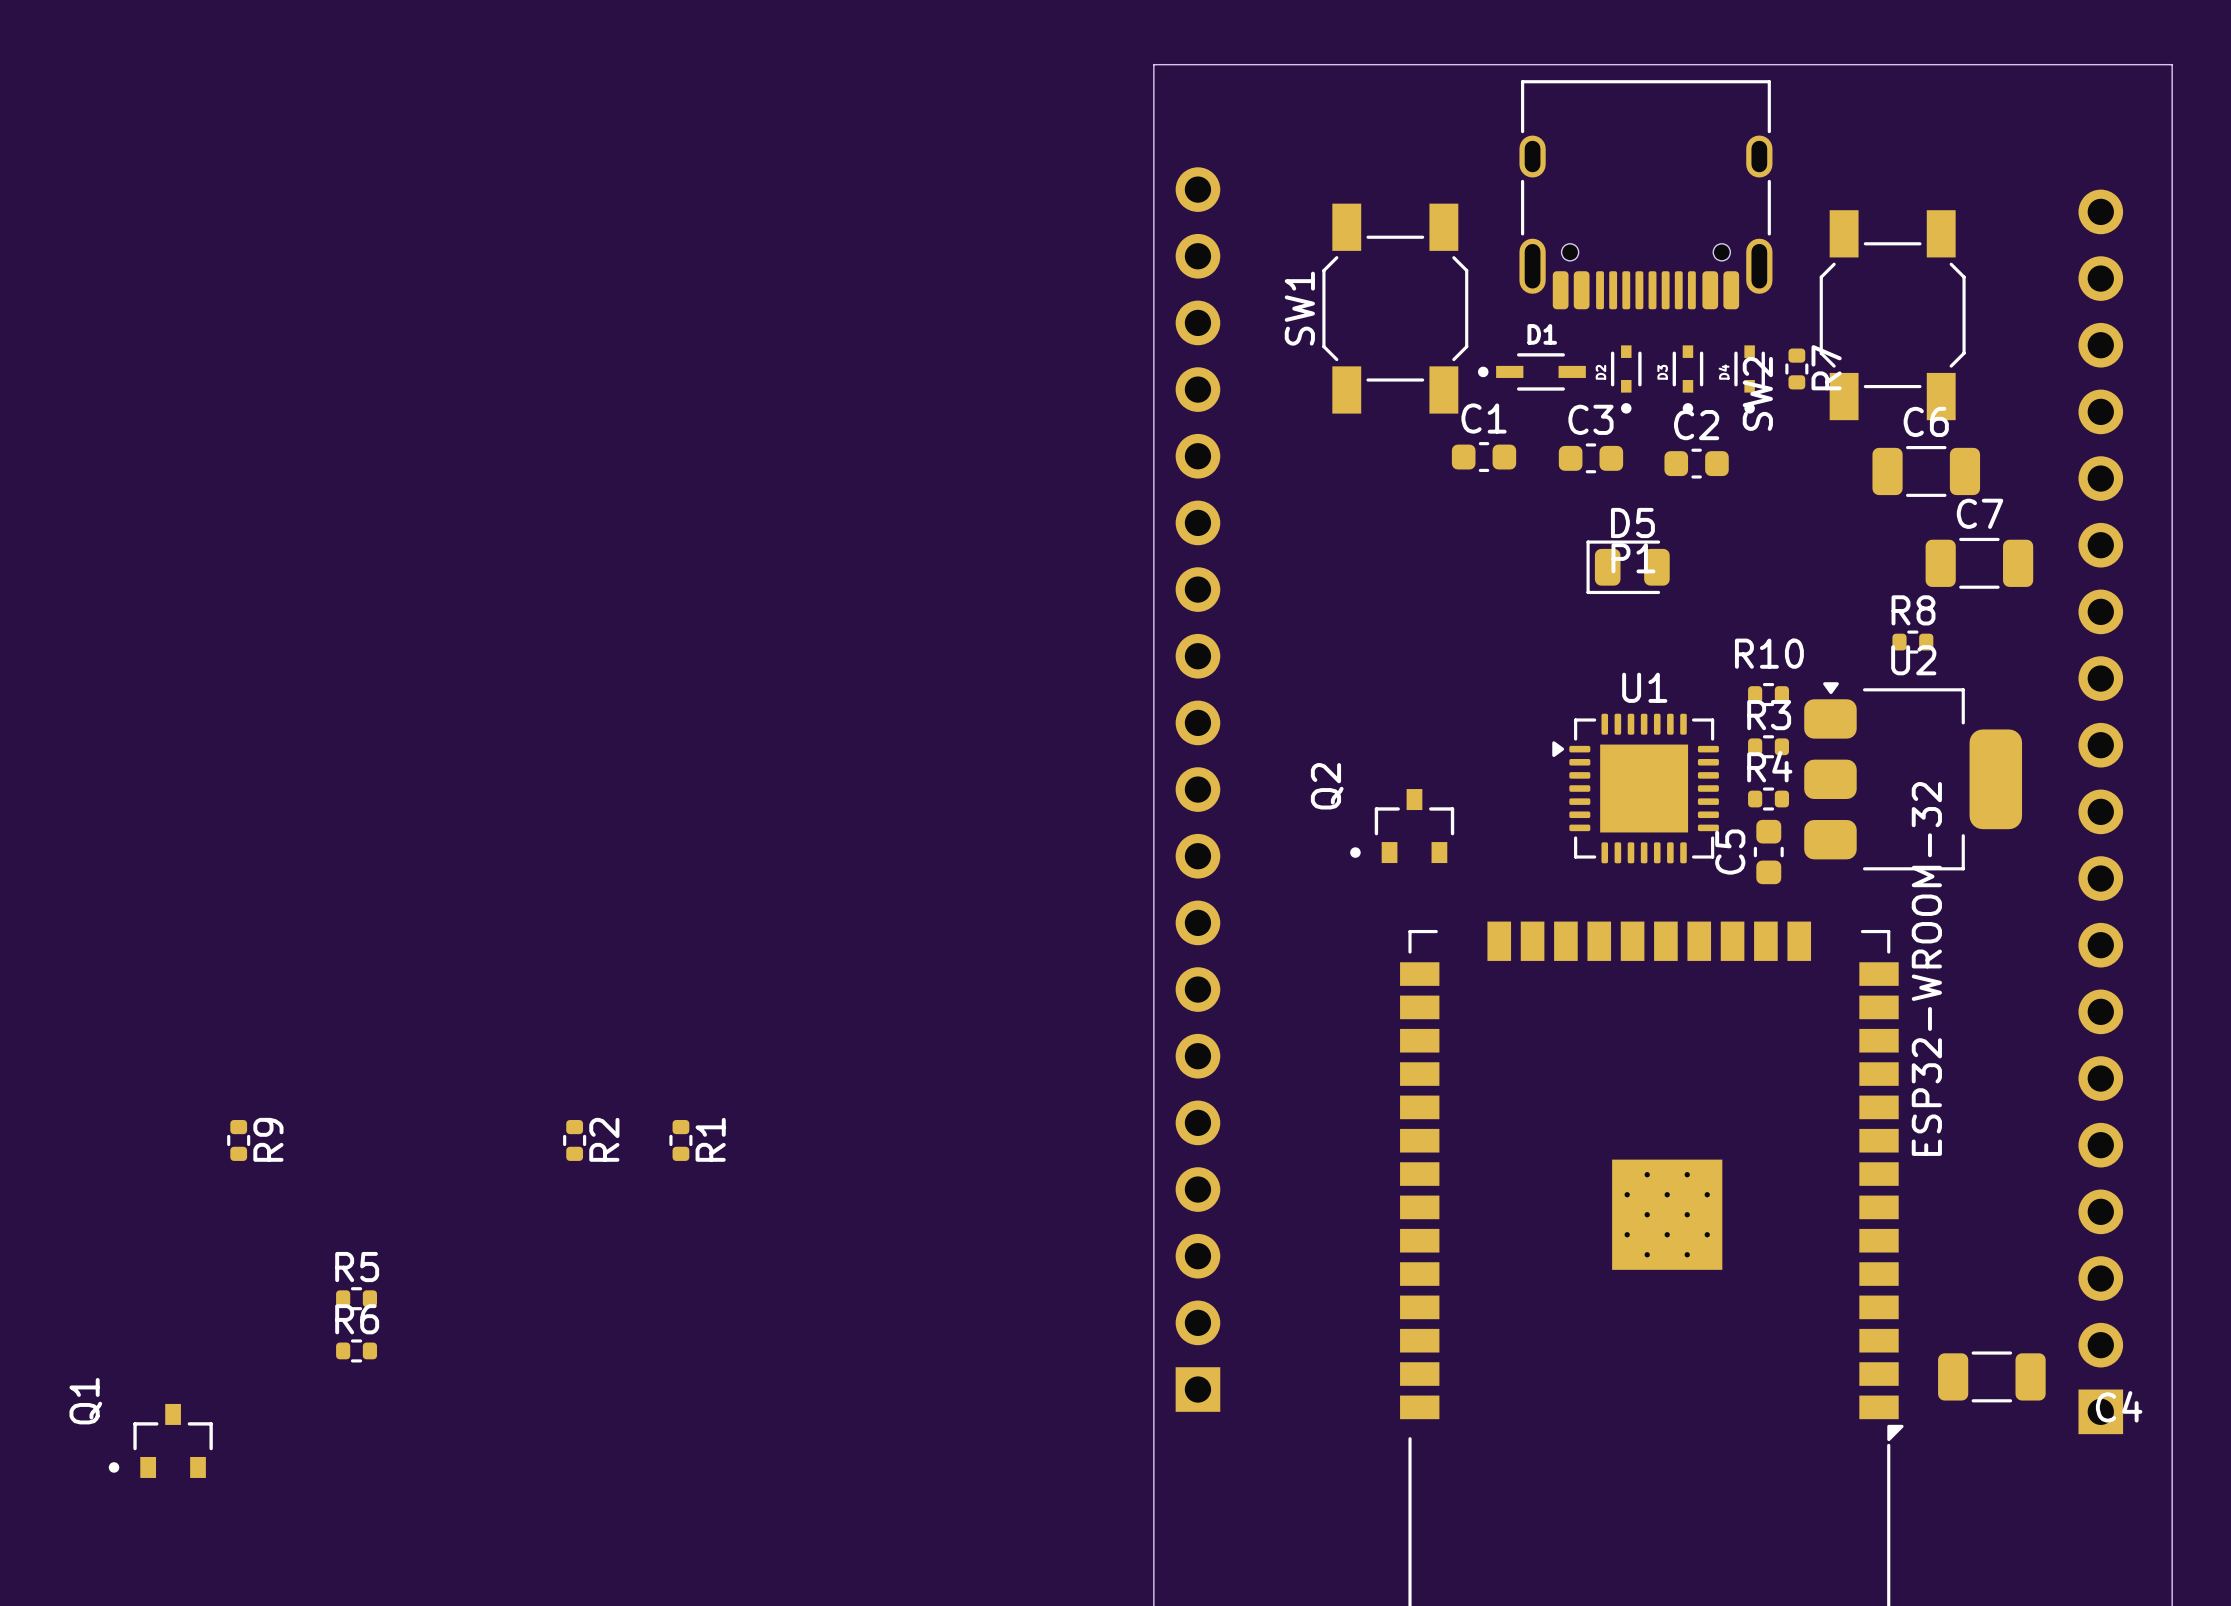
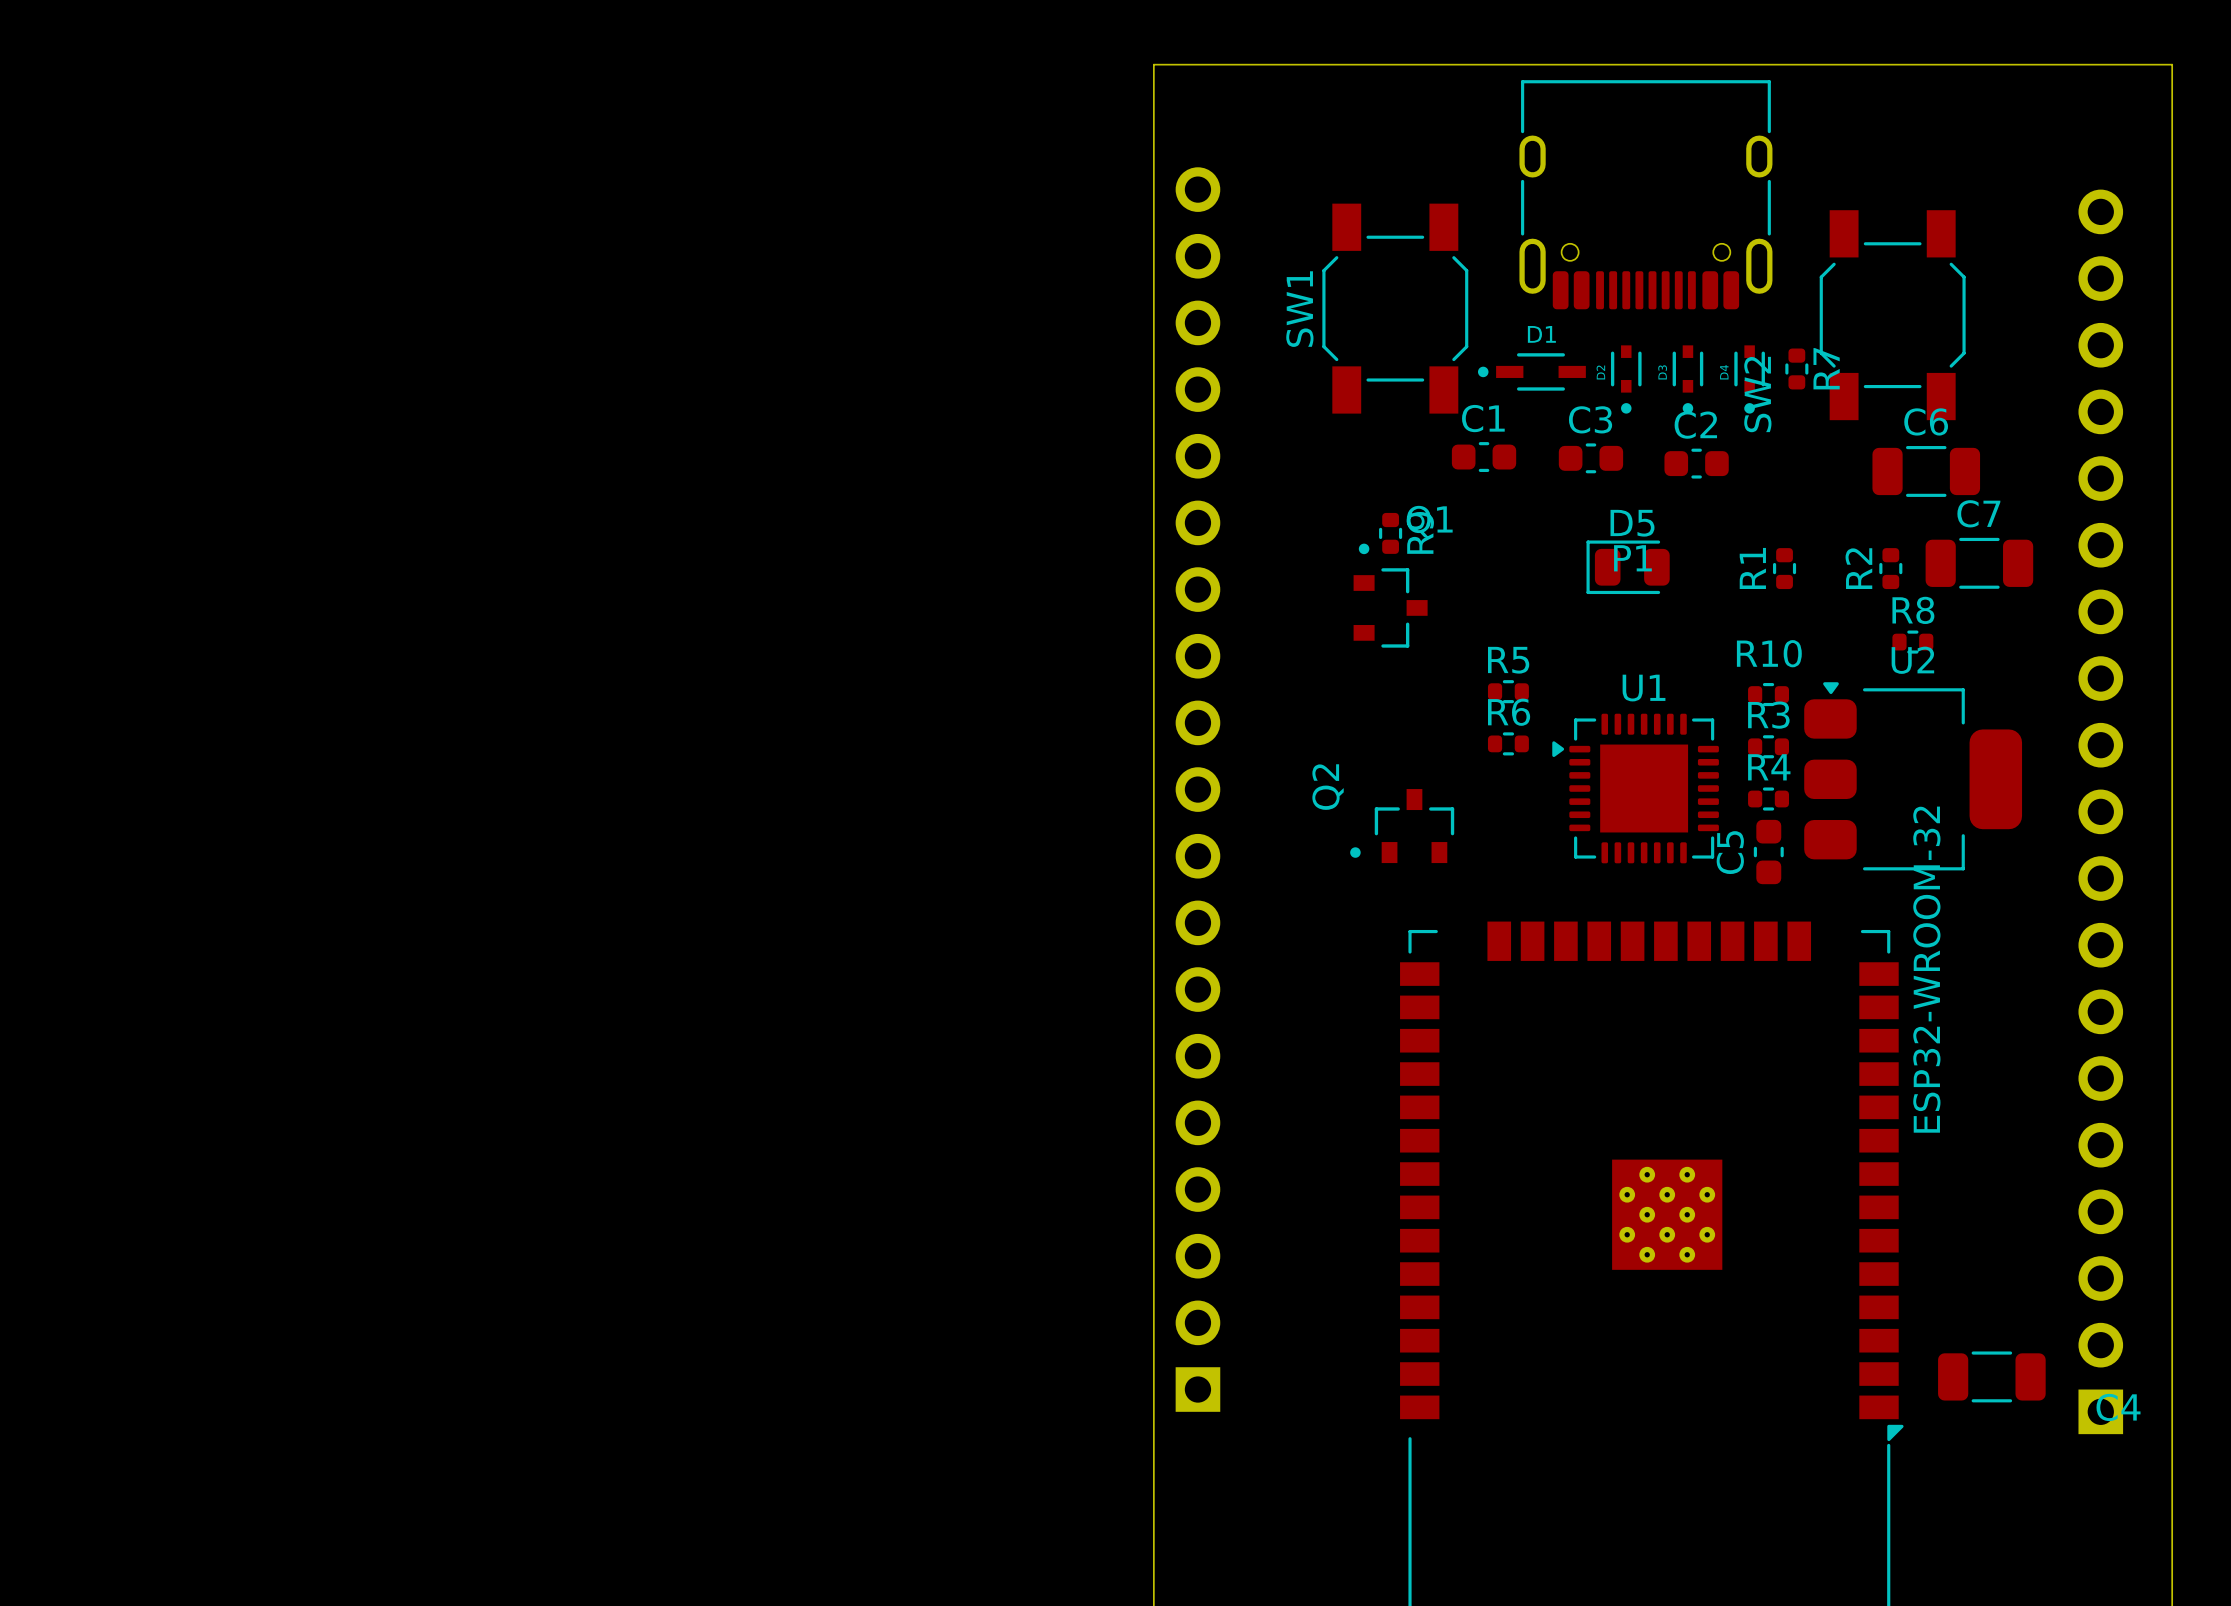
R2 name position: R2 (604, 1139) -> R2 (1858, 568)
R1 name position: R1 (710, 1139) -> R1 (1752, 568)
R9 position: (238, 1140) -> (1390, 533)
R2 position: (574, 1140) -> (1890, 568)
R1 position: (680, 1140) -> (1784, 568)
R5 position: (356, 1298) -> (1508, 691)
R6 position: (356, 1350) -> (1508, 743)
Q1 rotation: 0° (160, 1440) -> 90° clockwise (1390, 595)
Q1 position: (160, 1440) -> (1390, 595)

